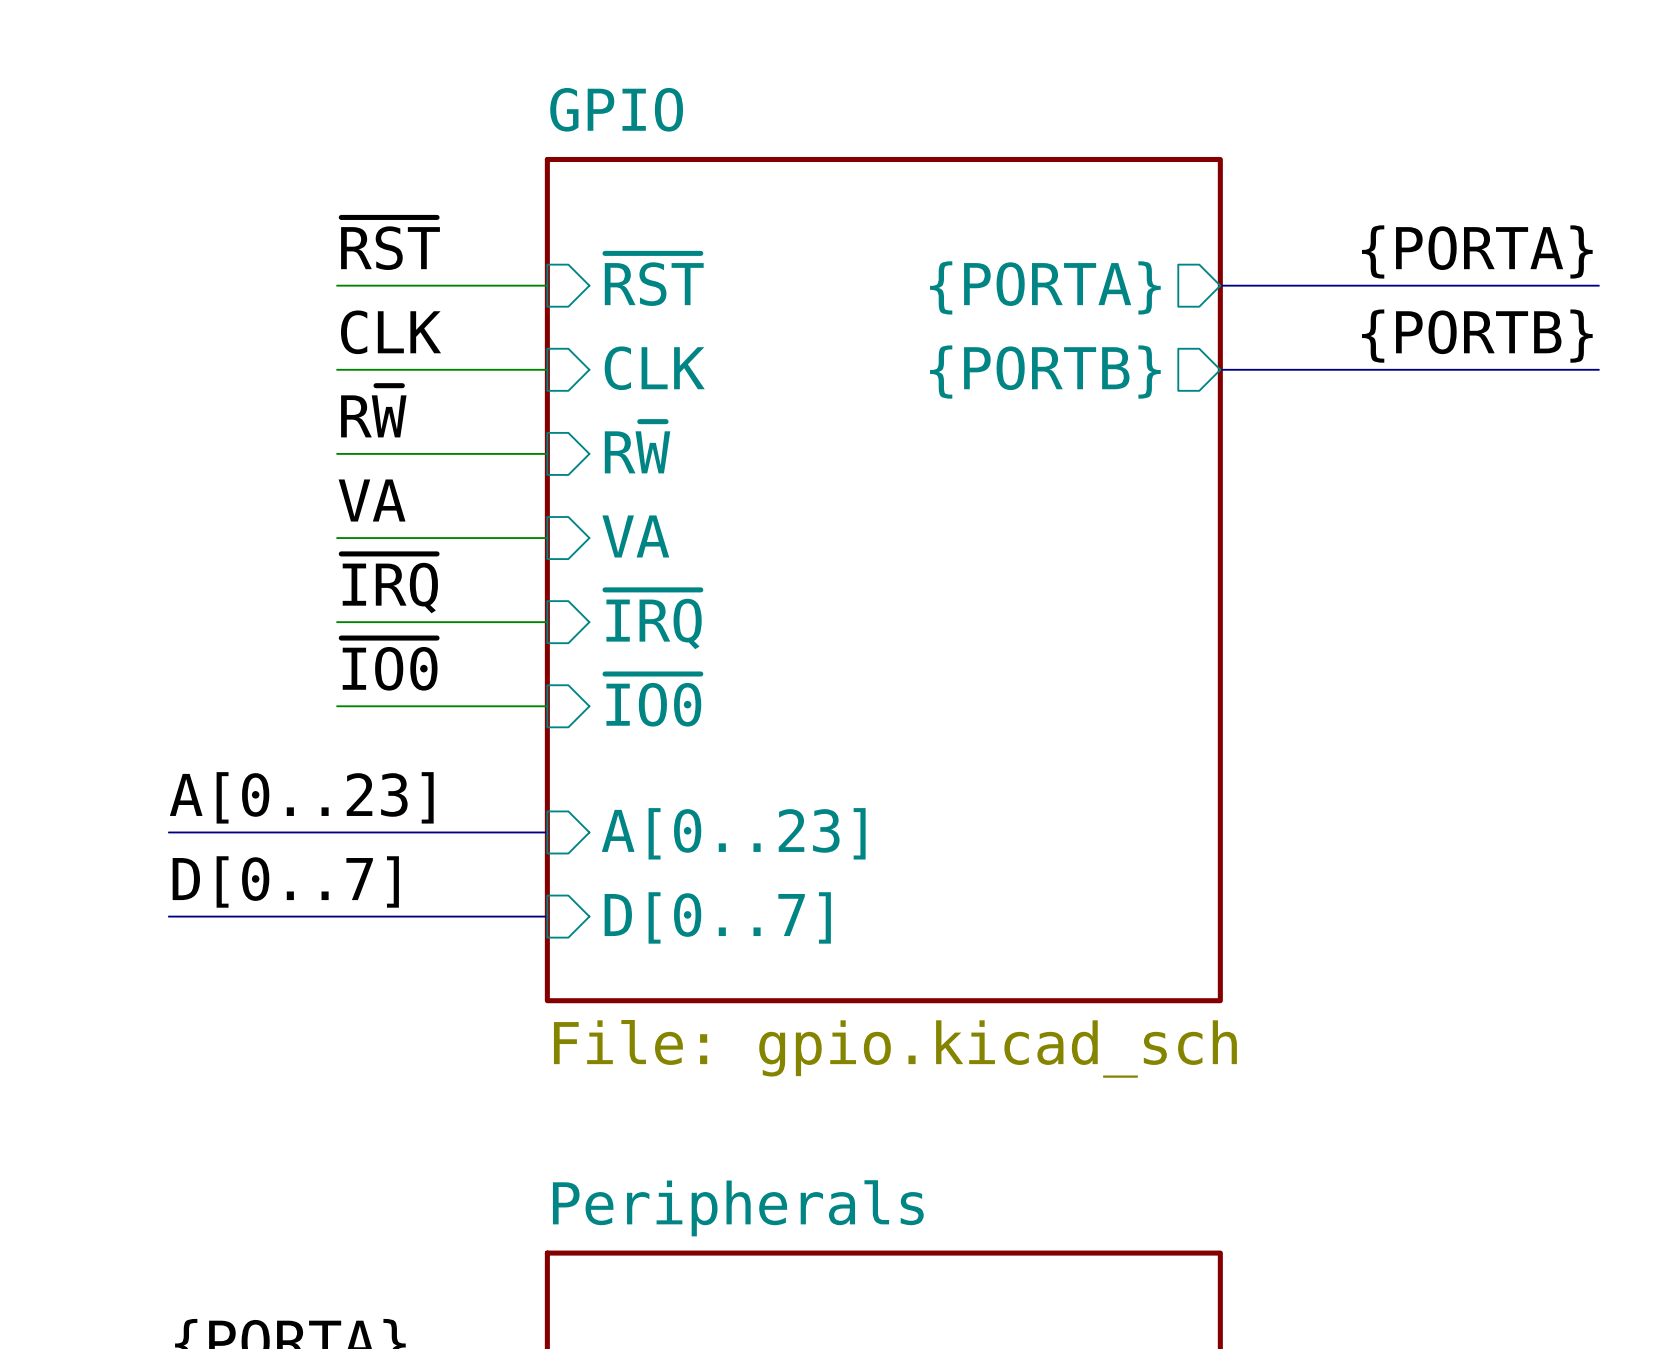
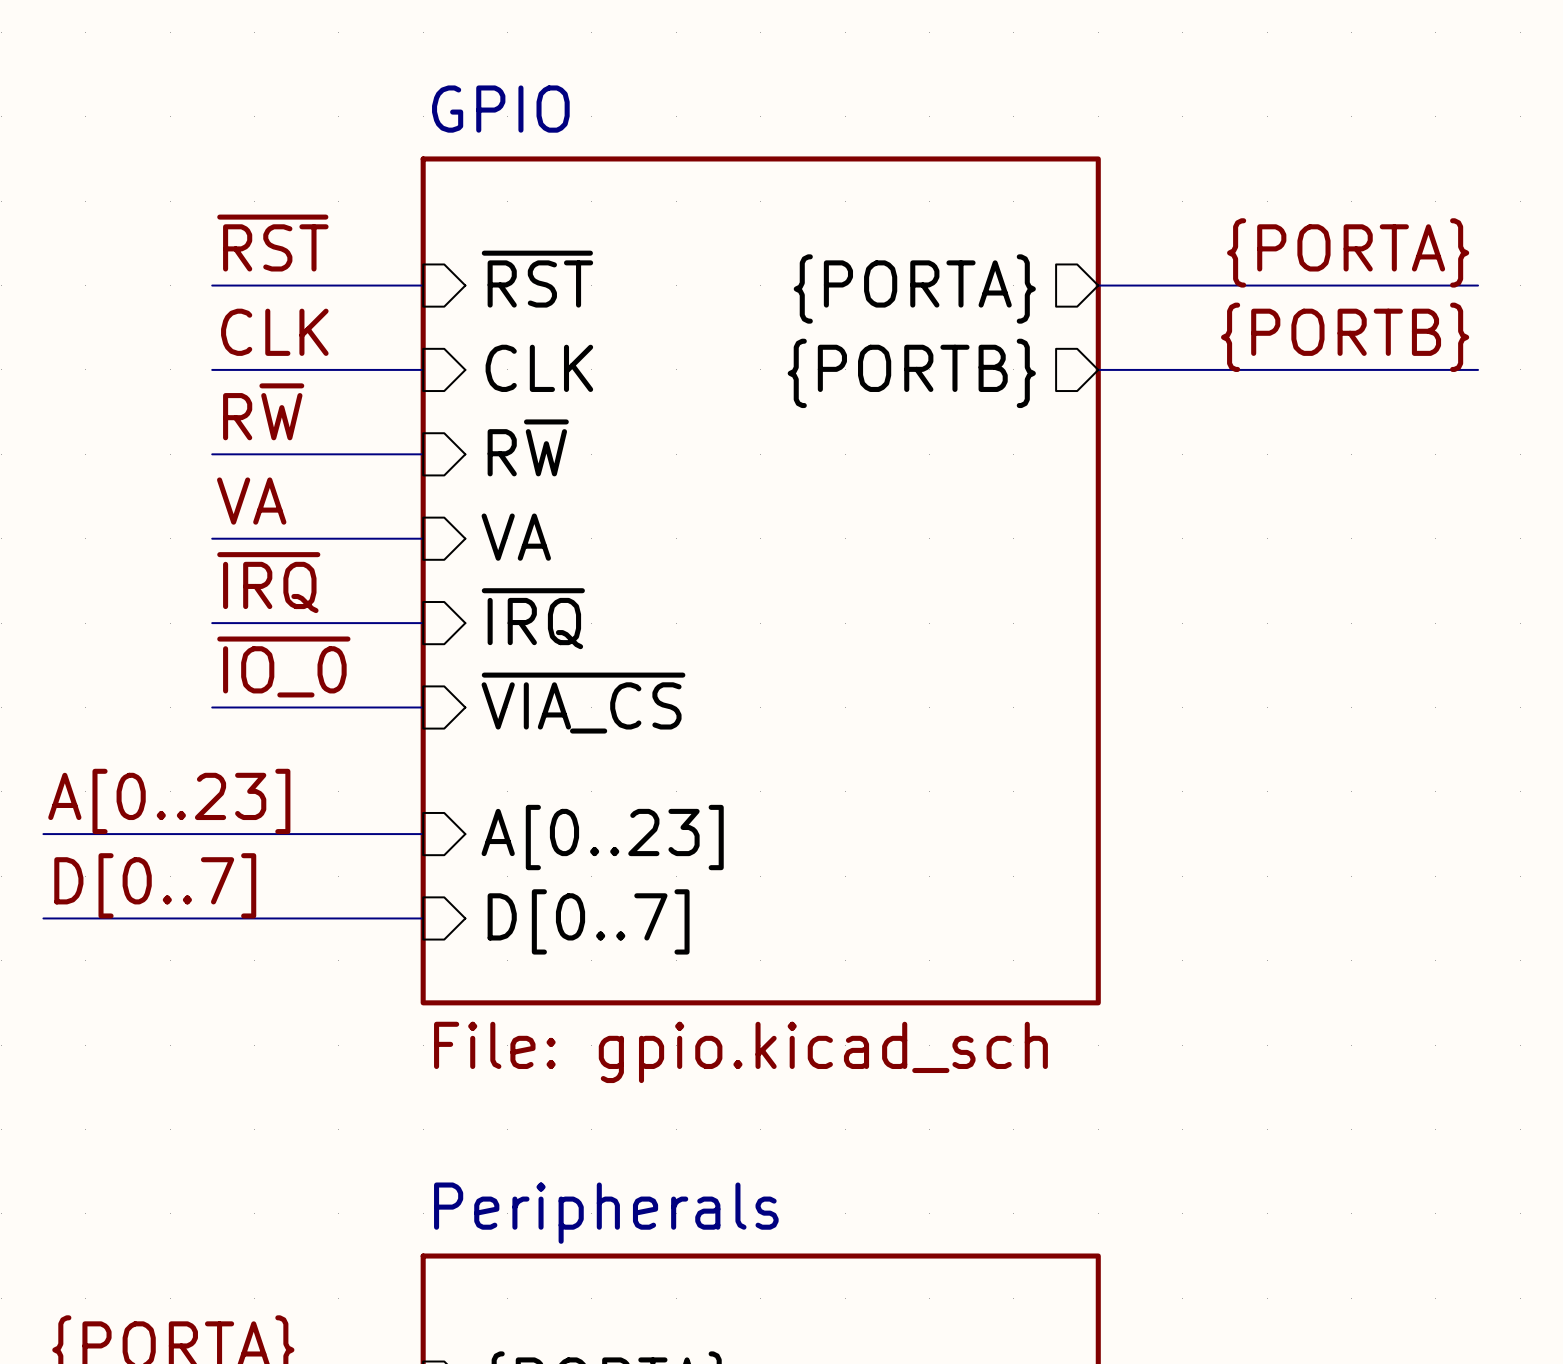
label: ~{IO0} (389, 664) -> ~{IO_0} (283, 666)
sheet pin: ~{IO0} (653, 700) -> ~{VIA_CS} (583, 703)

